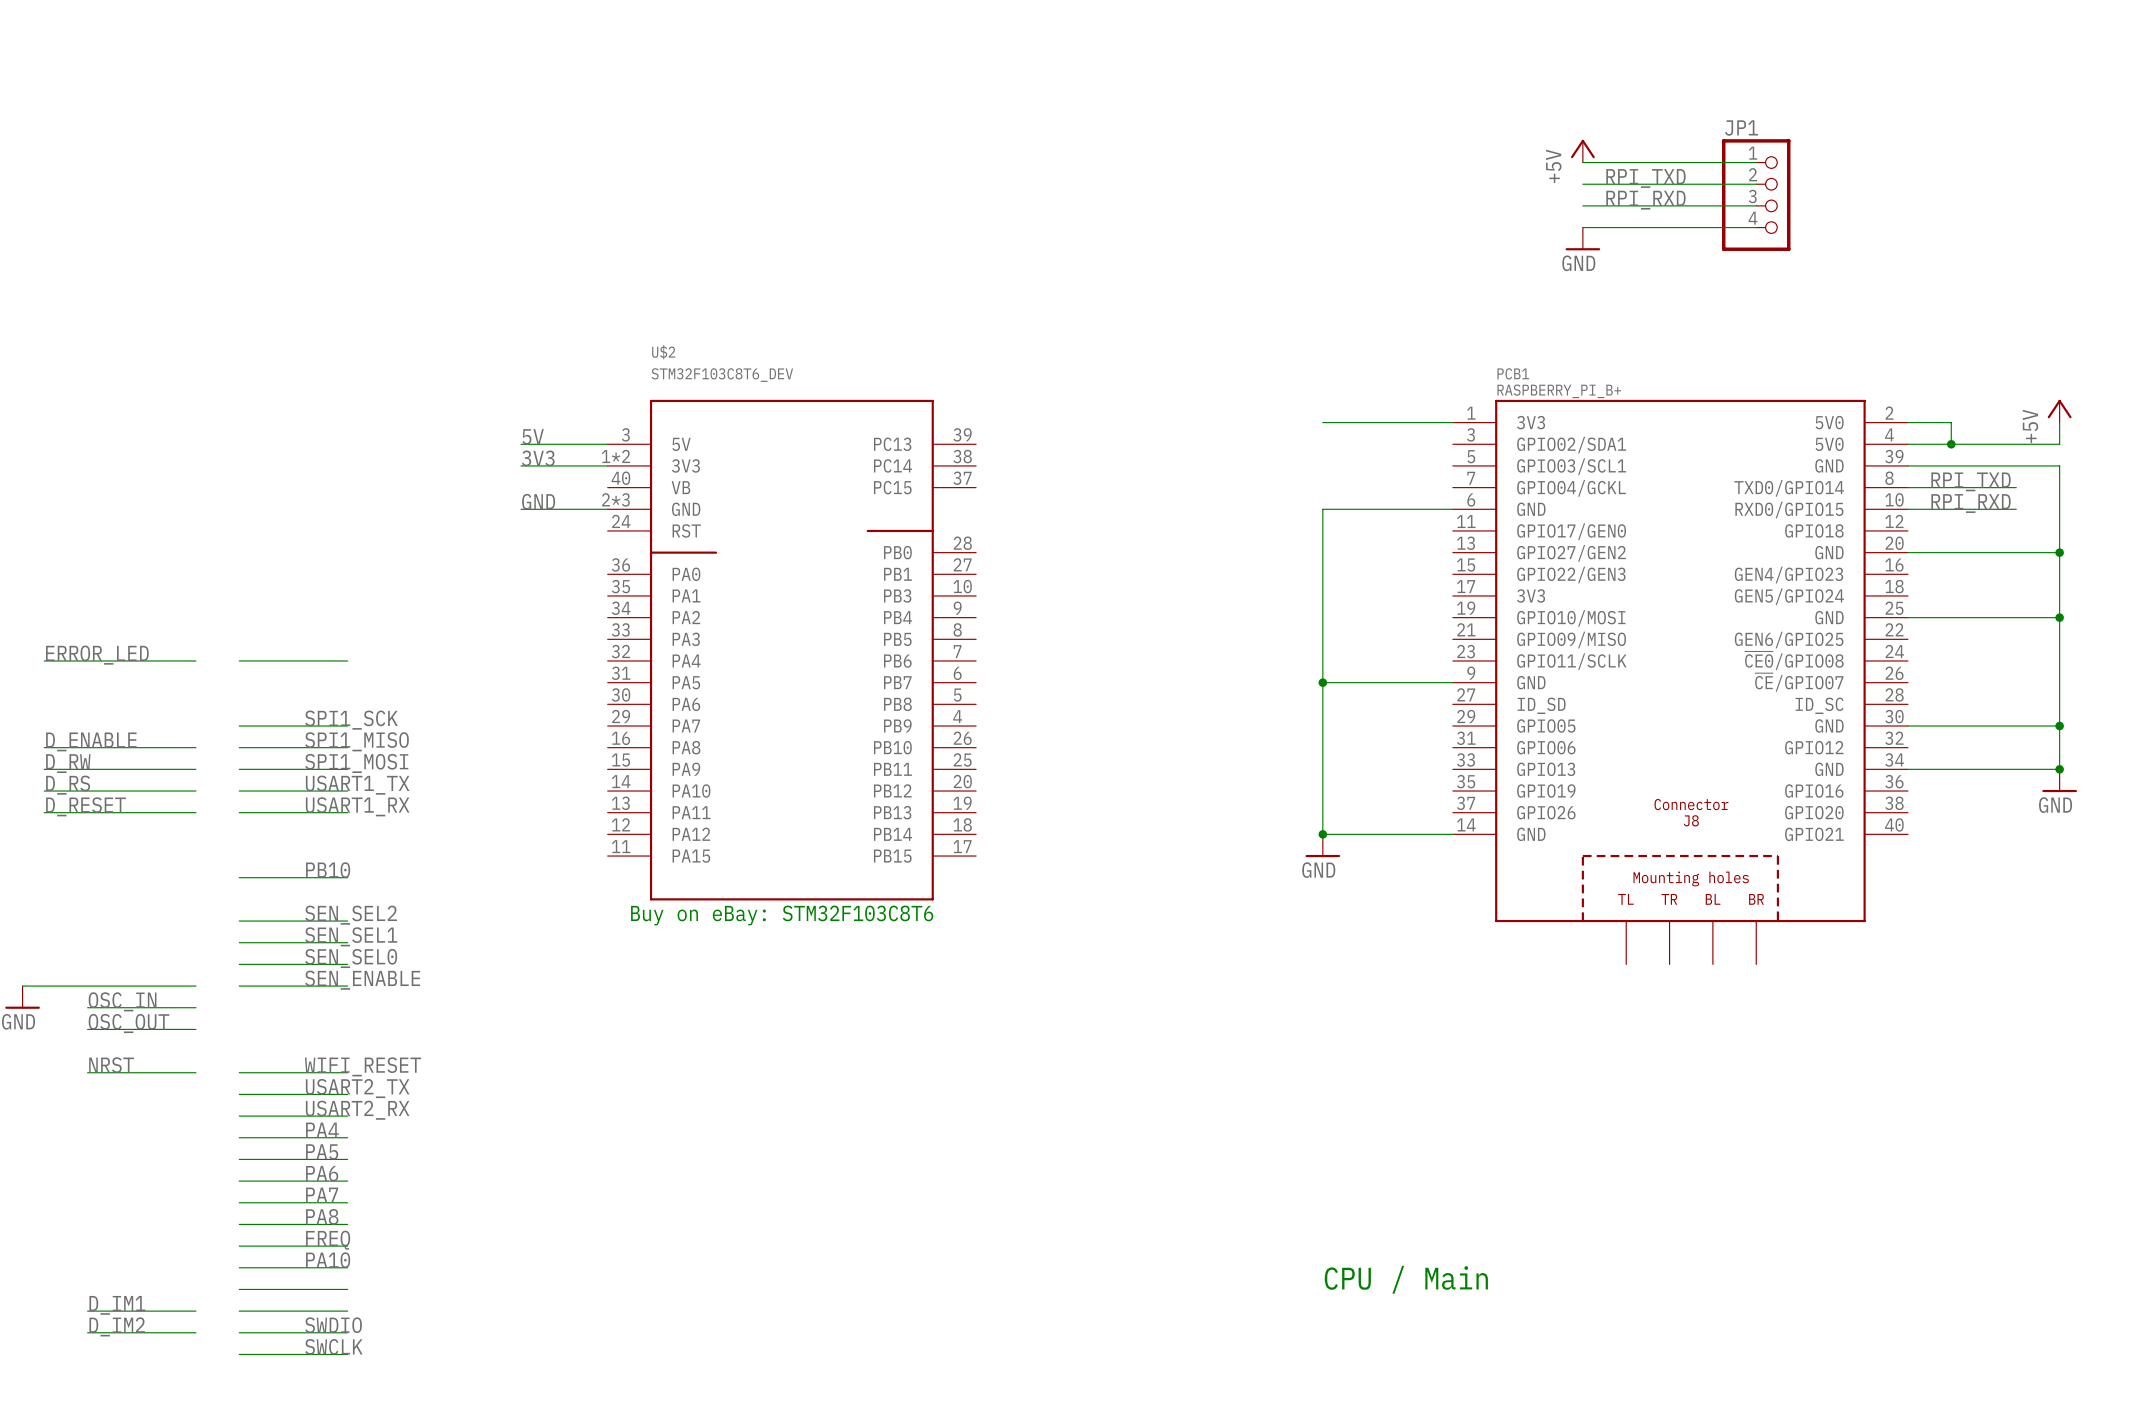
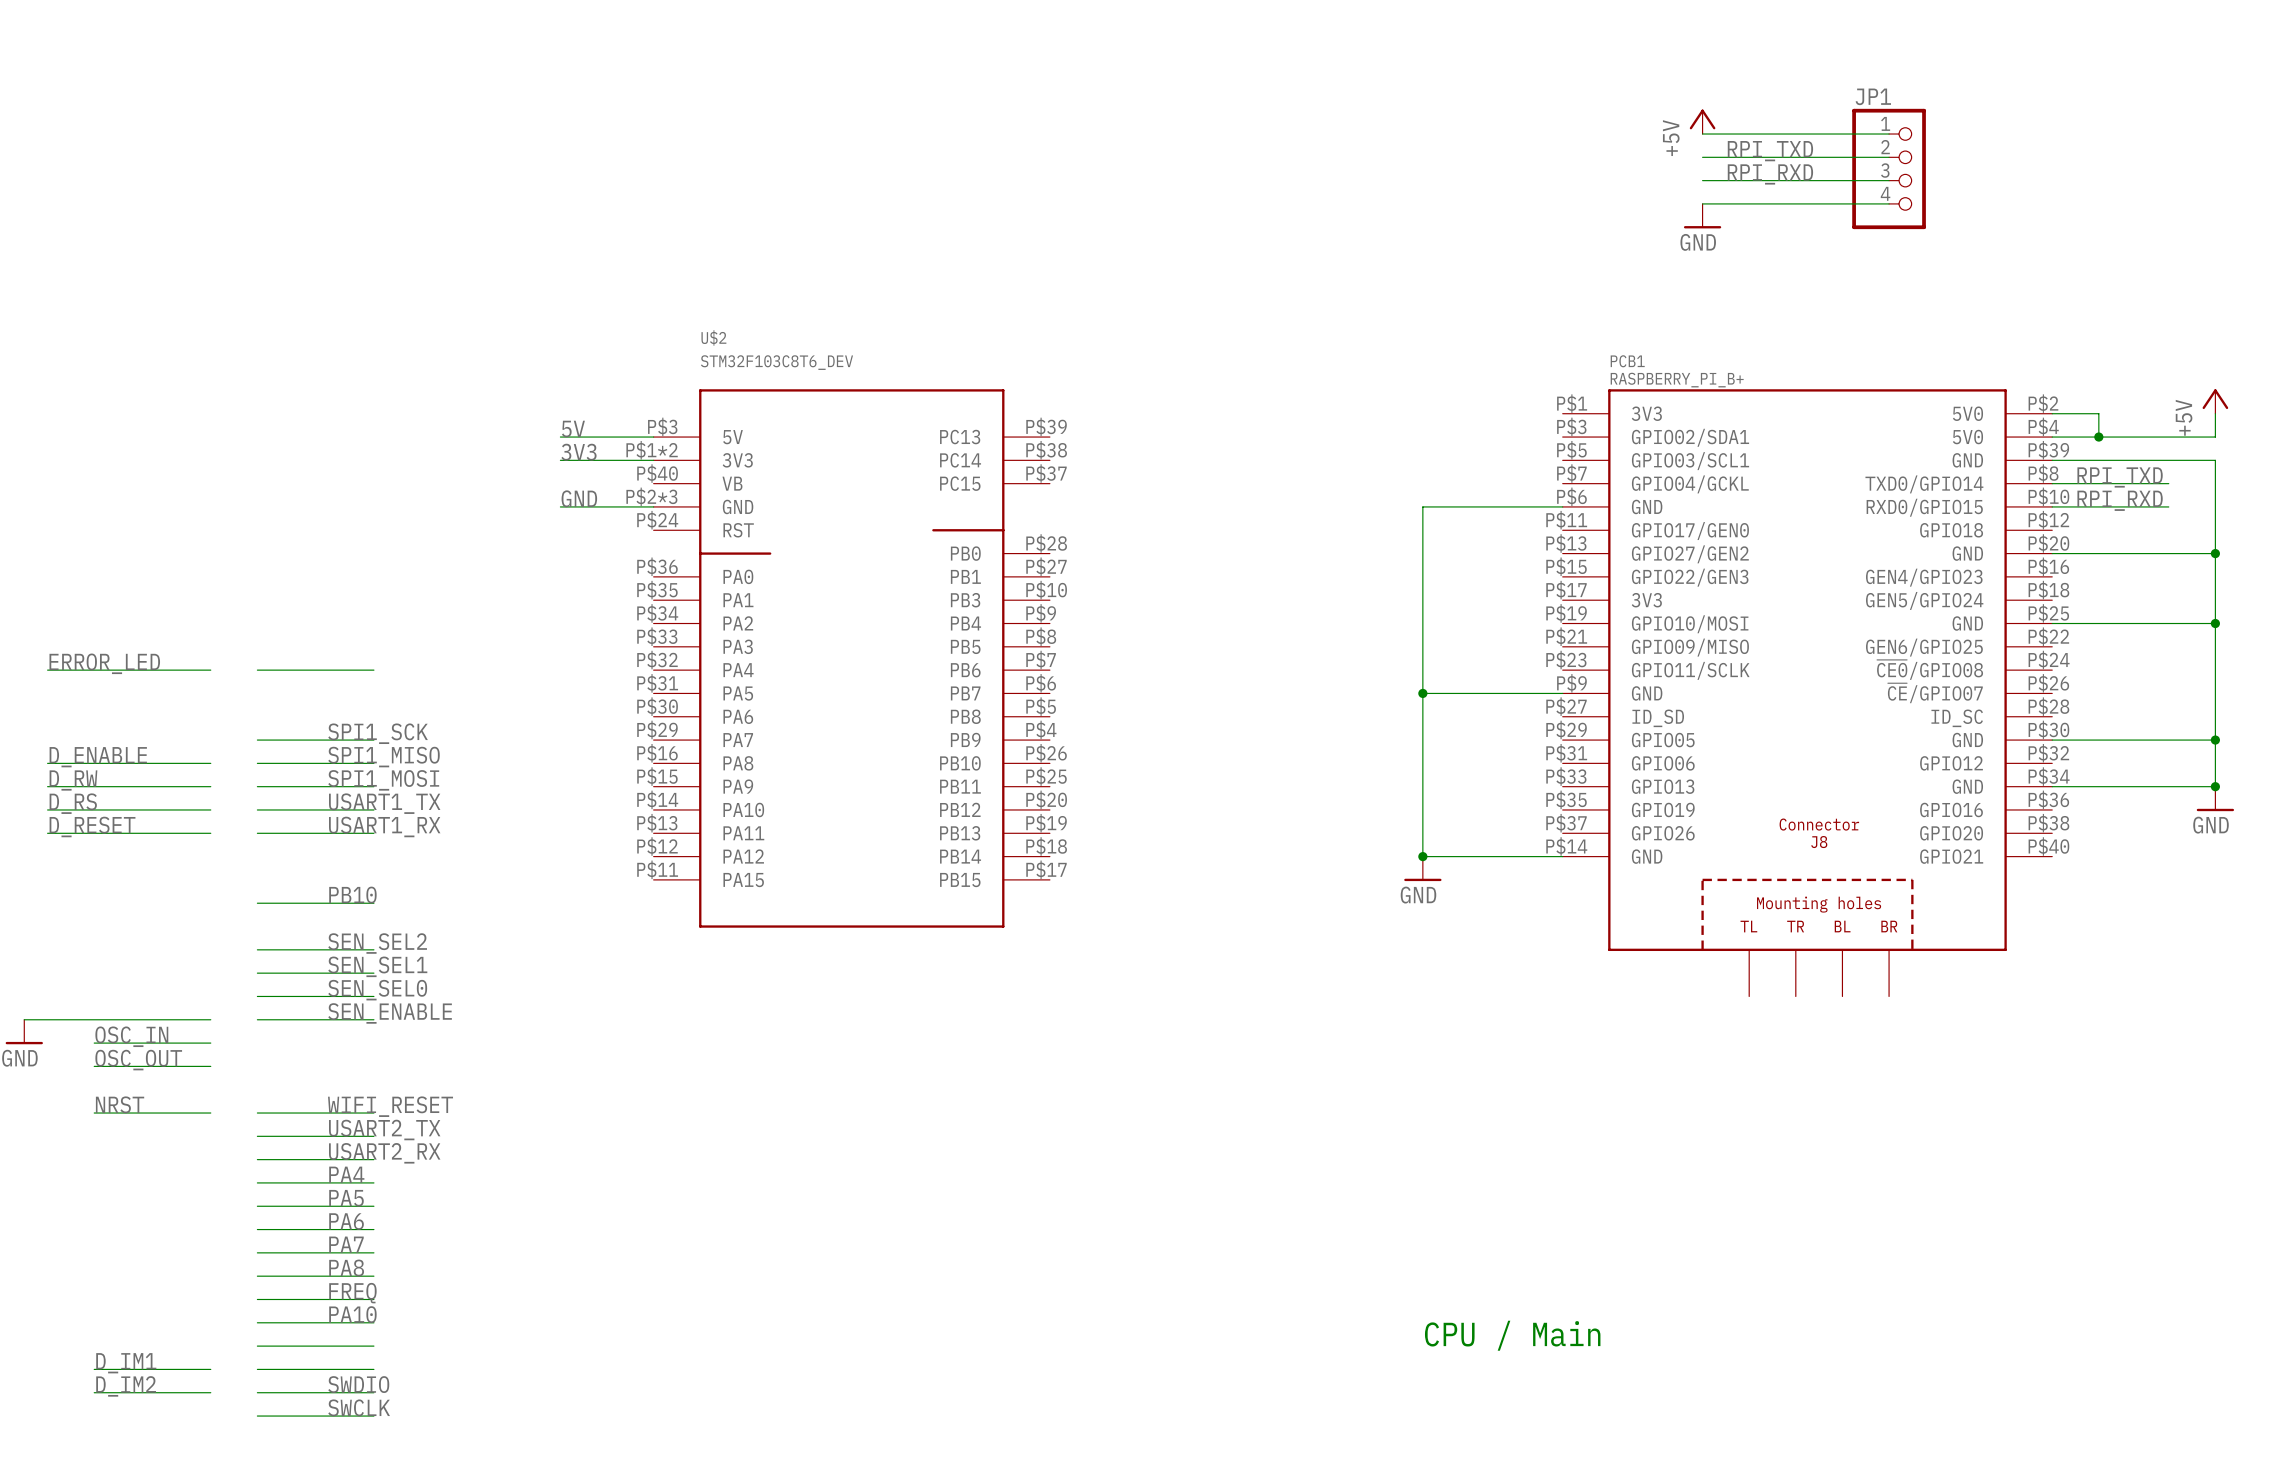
U$2 symbol: [607, 399, 977, 901] -> [653, 389, 1050, 928]
PCB1 symbol: [1452, 399, 1908, 965] -> [1562, 389, 2053, 997]
wire: (1322, 422) (1452, 422) -> none
text: Buy on eBay: STM32F103C8T6 (782, 915) -> none

